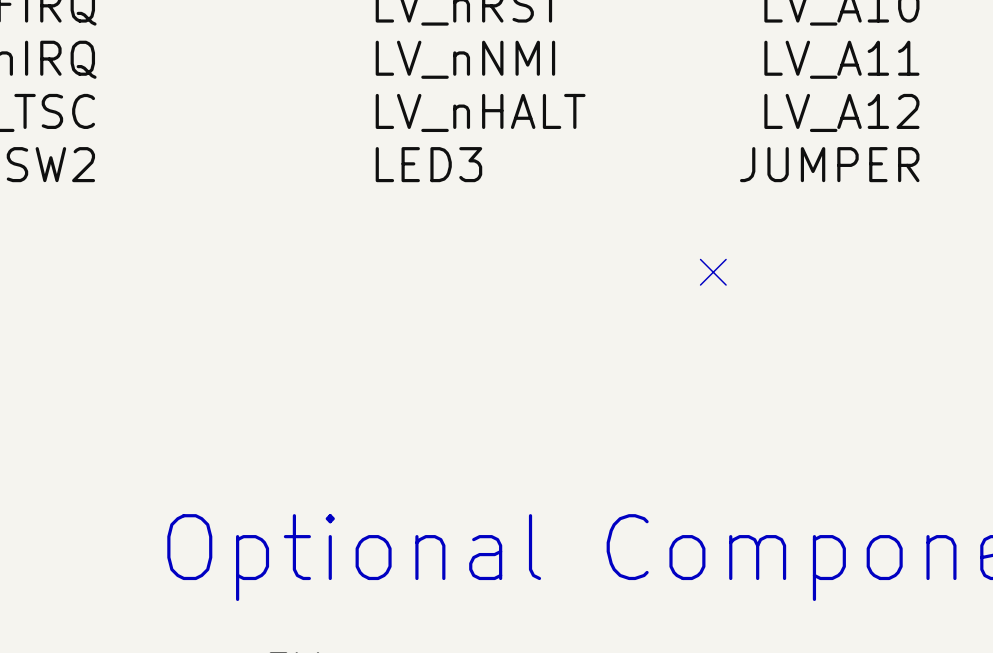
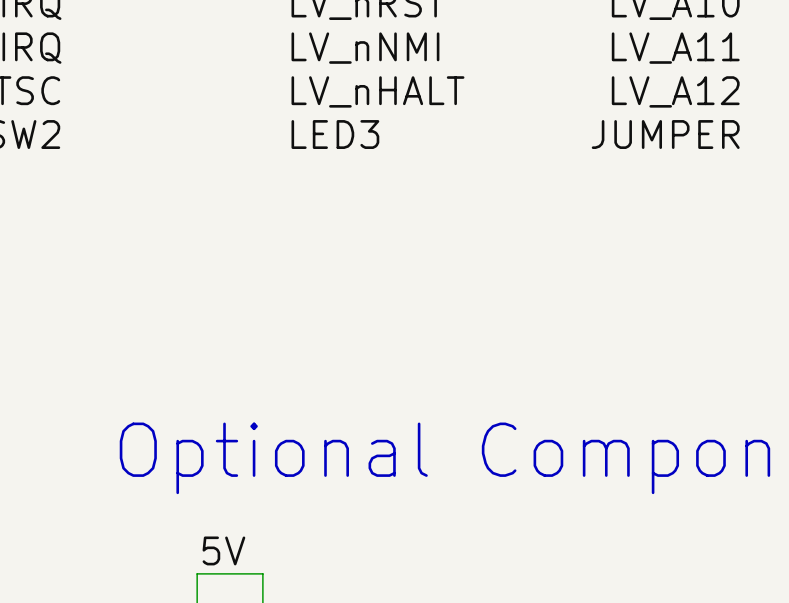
no-connect mark: (713, 272) -> none

